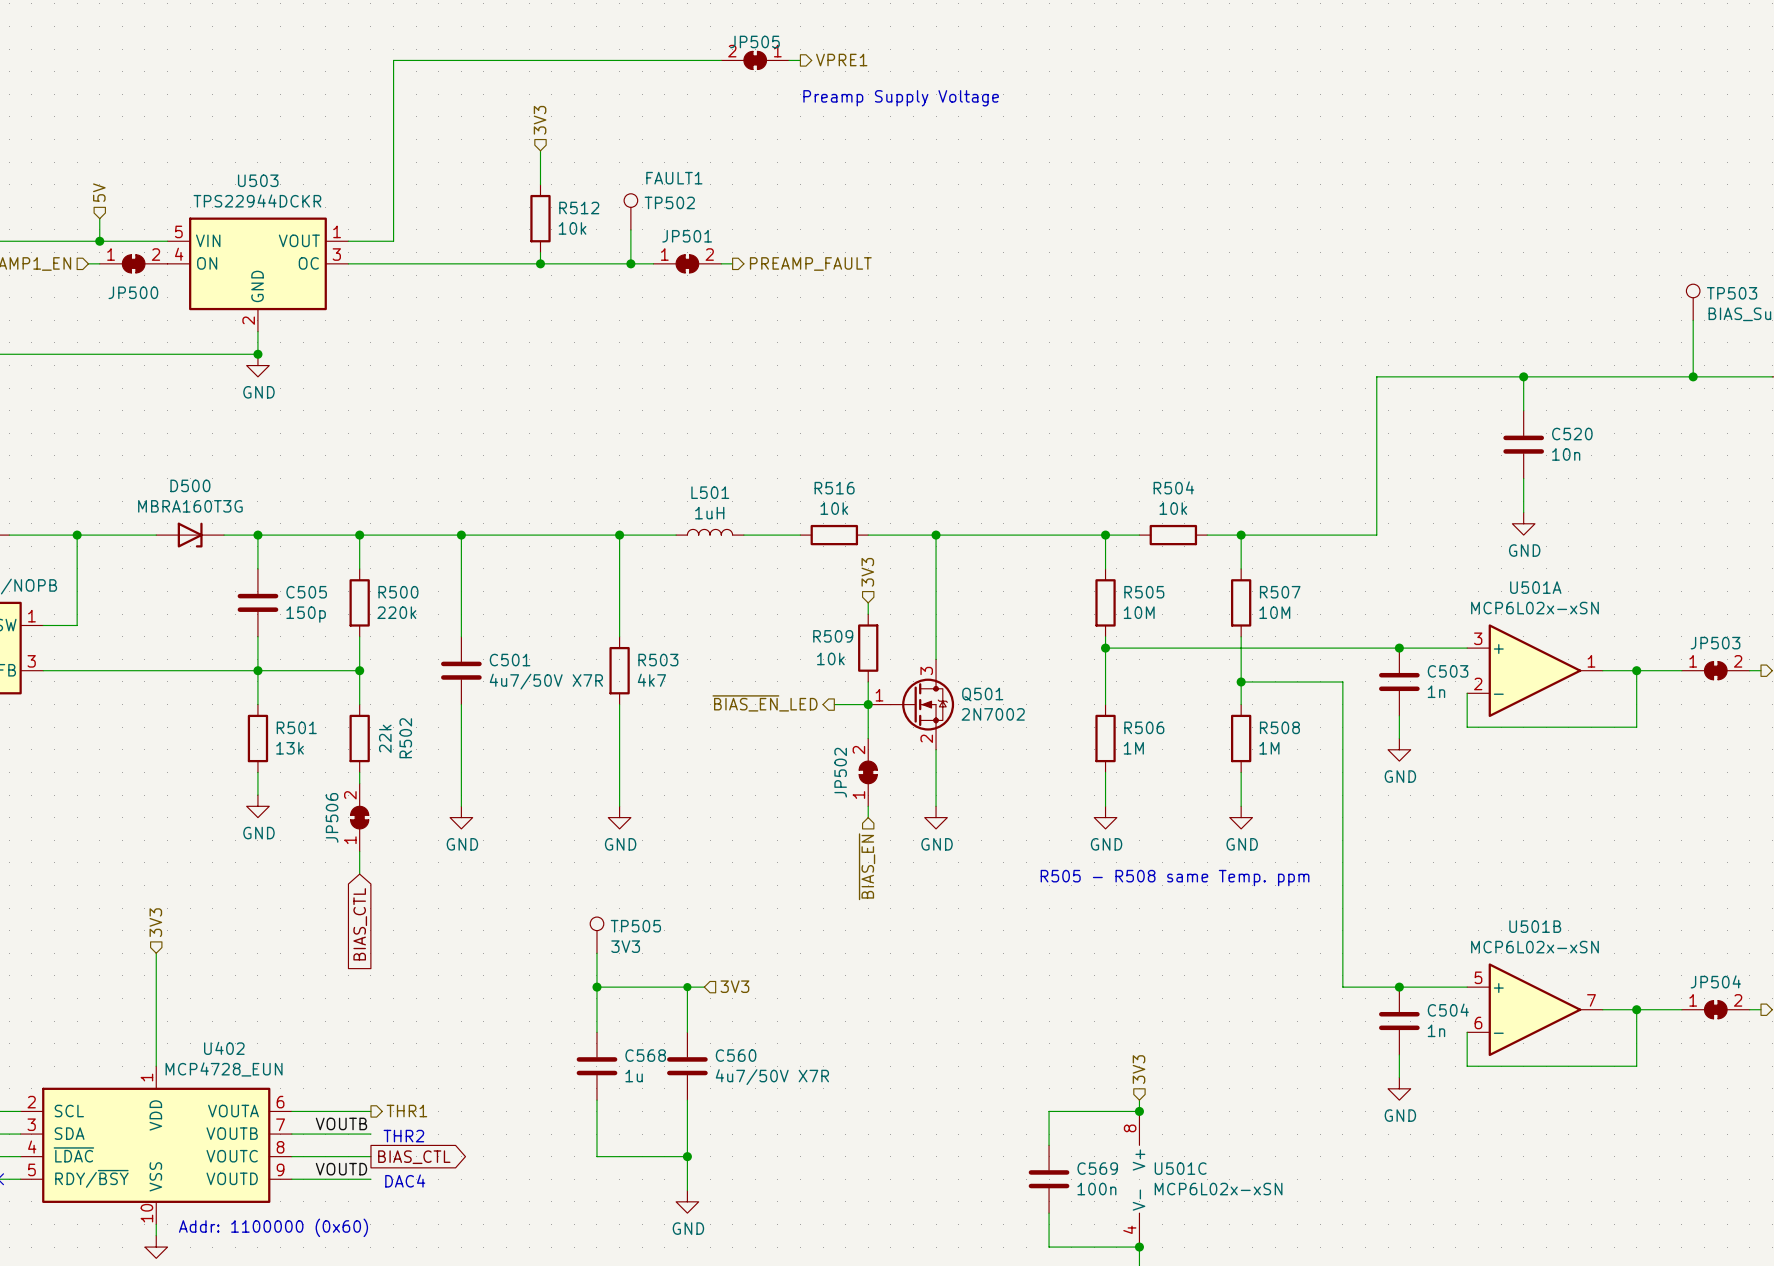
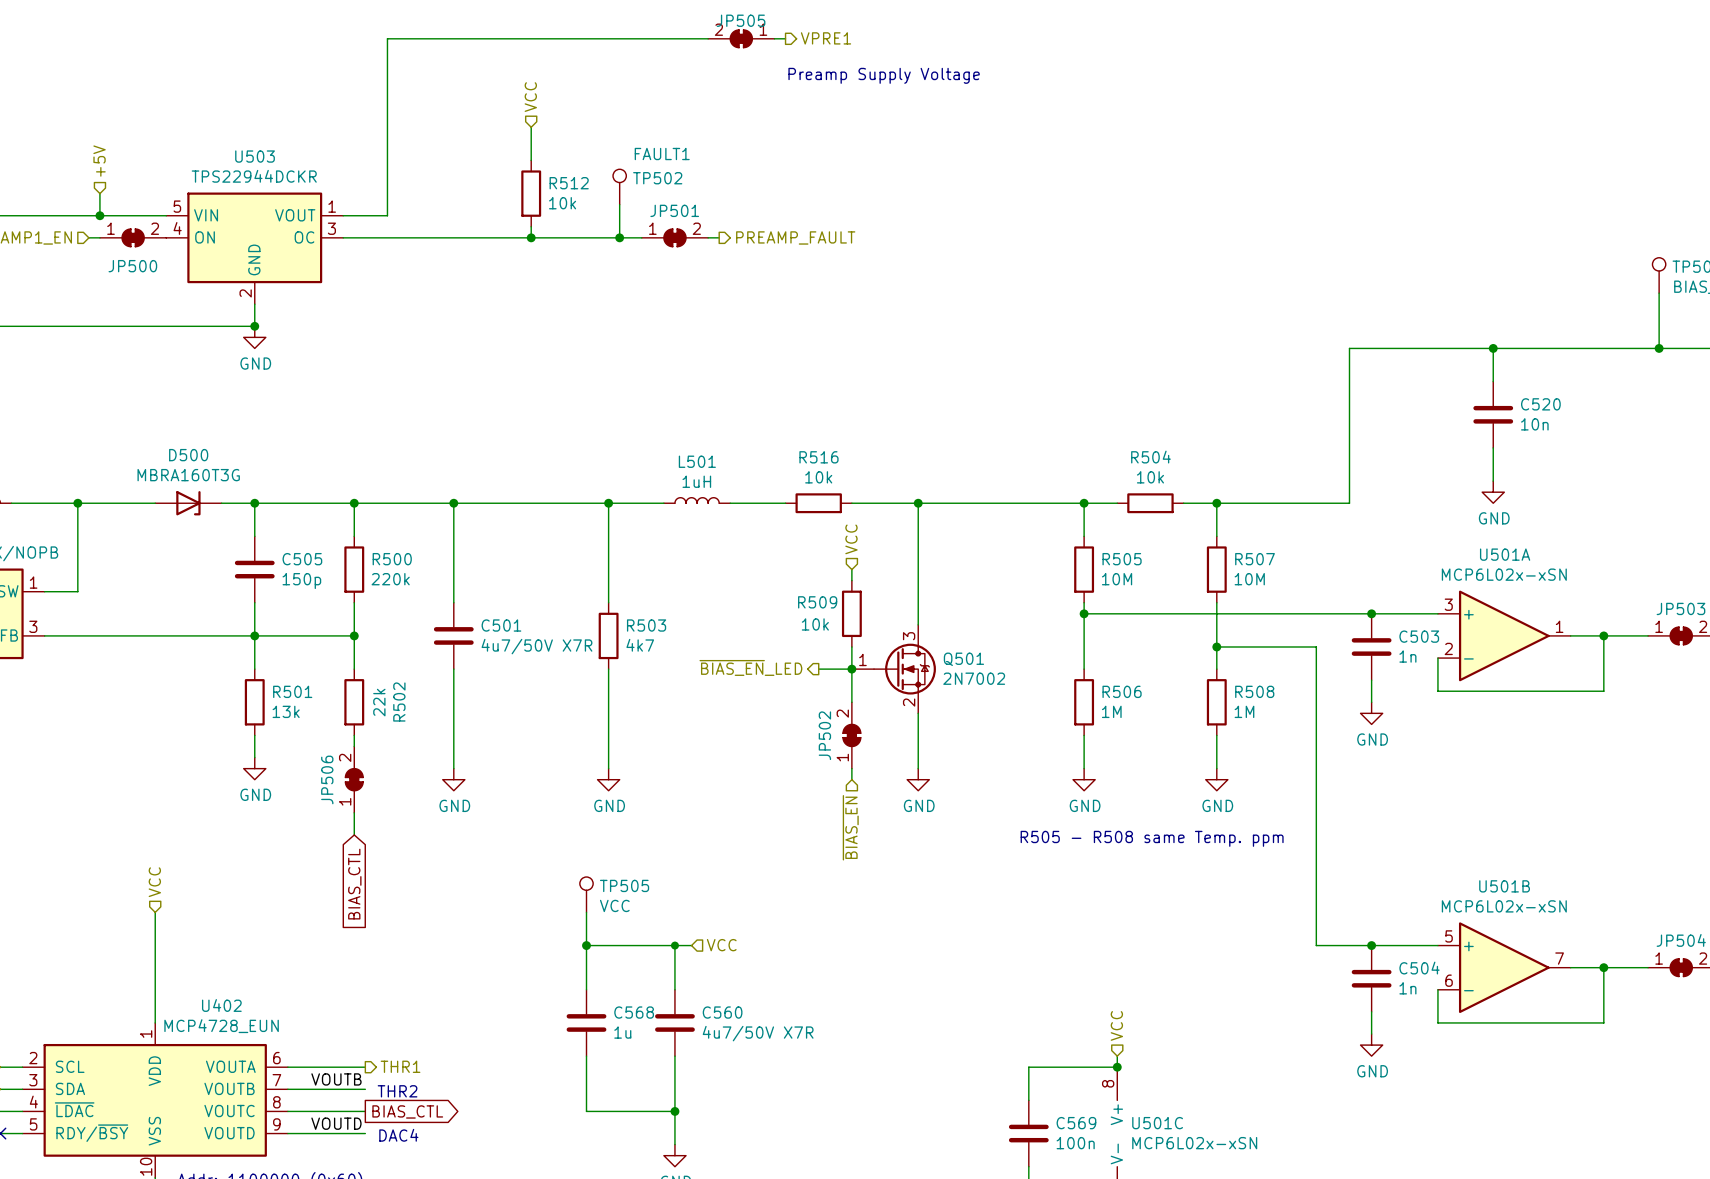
hierarchical label: 3V3 (540, 120) -> VCC (530, 97)
hierarchical label: 5V (99, 192) -> +5V (99, 161)
hierarchical label: 3V3 (867, 572) -> VCC (851, 539)
hierarchical label: 3V3 (155, 922) -> VCC (154, 882)
TP505 value: 3V3 (625, 946) -> VCC (614, 905)
hierarchical label: 3V3 (734, 986) -> VCC (721, 945)
hierarchical label: 3V3 (1139, 1069) -> VCC (1116, 1025)

